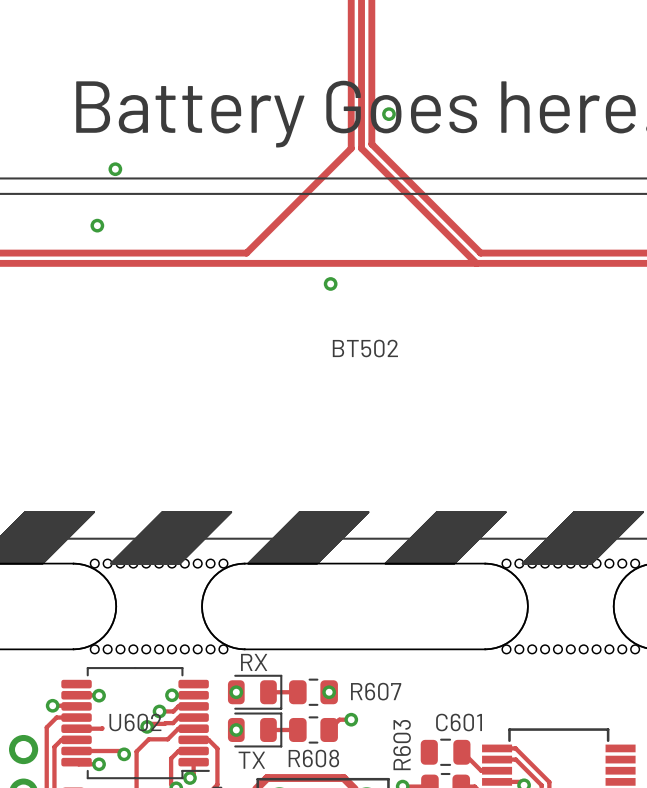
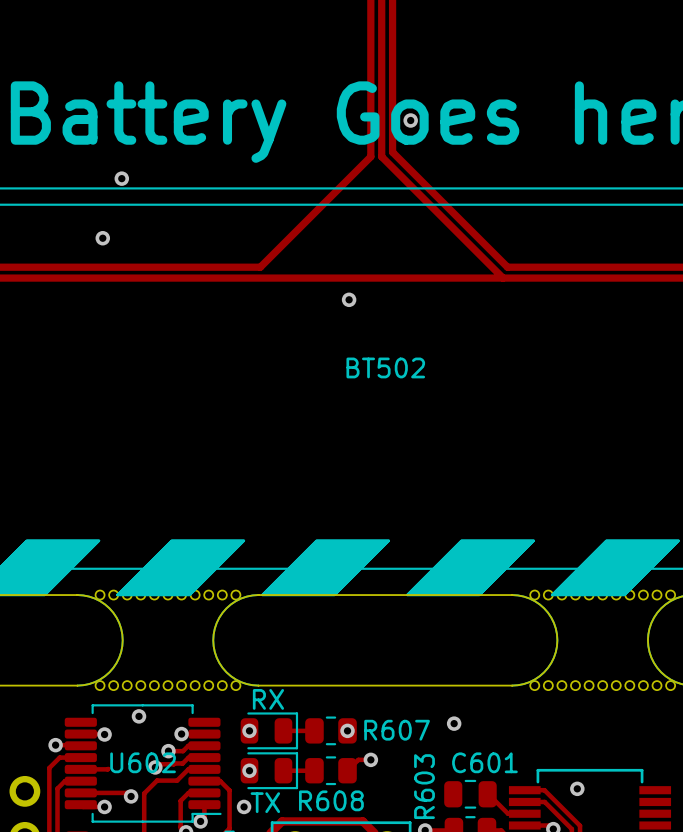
via: none -> (139, 716)
via: none -> (454, 723)
via: none -> (577, 788)
via: none -> (244, 806)

